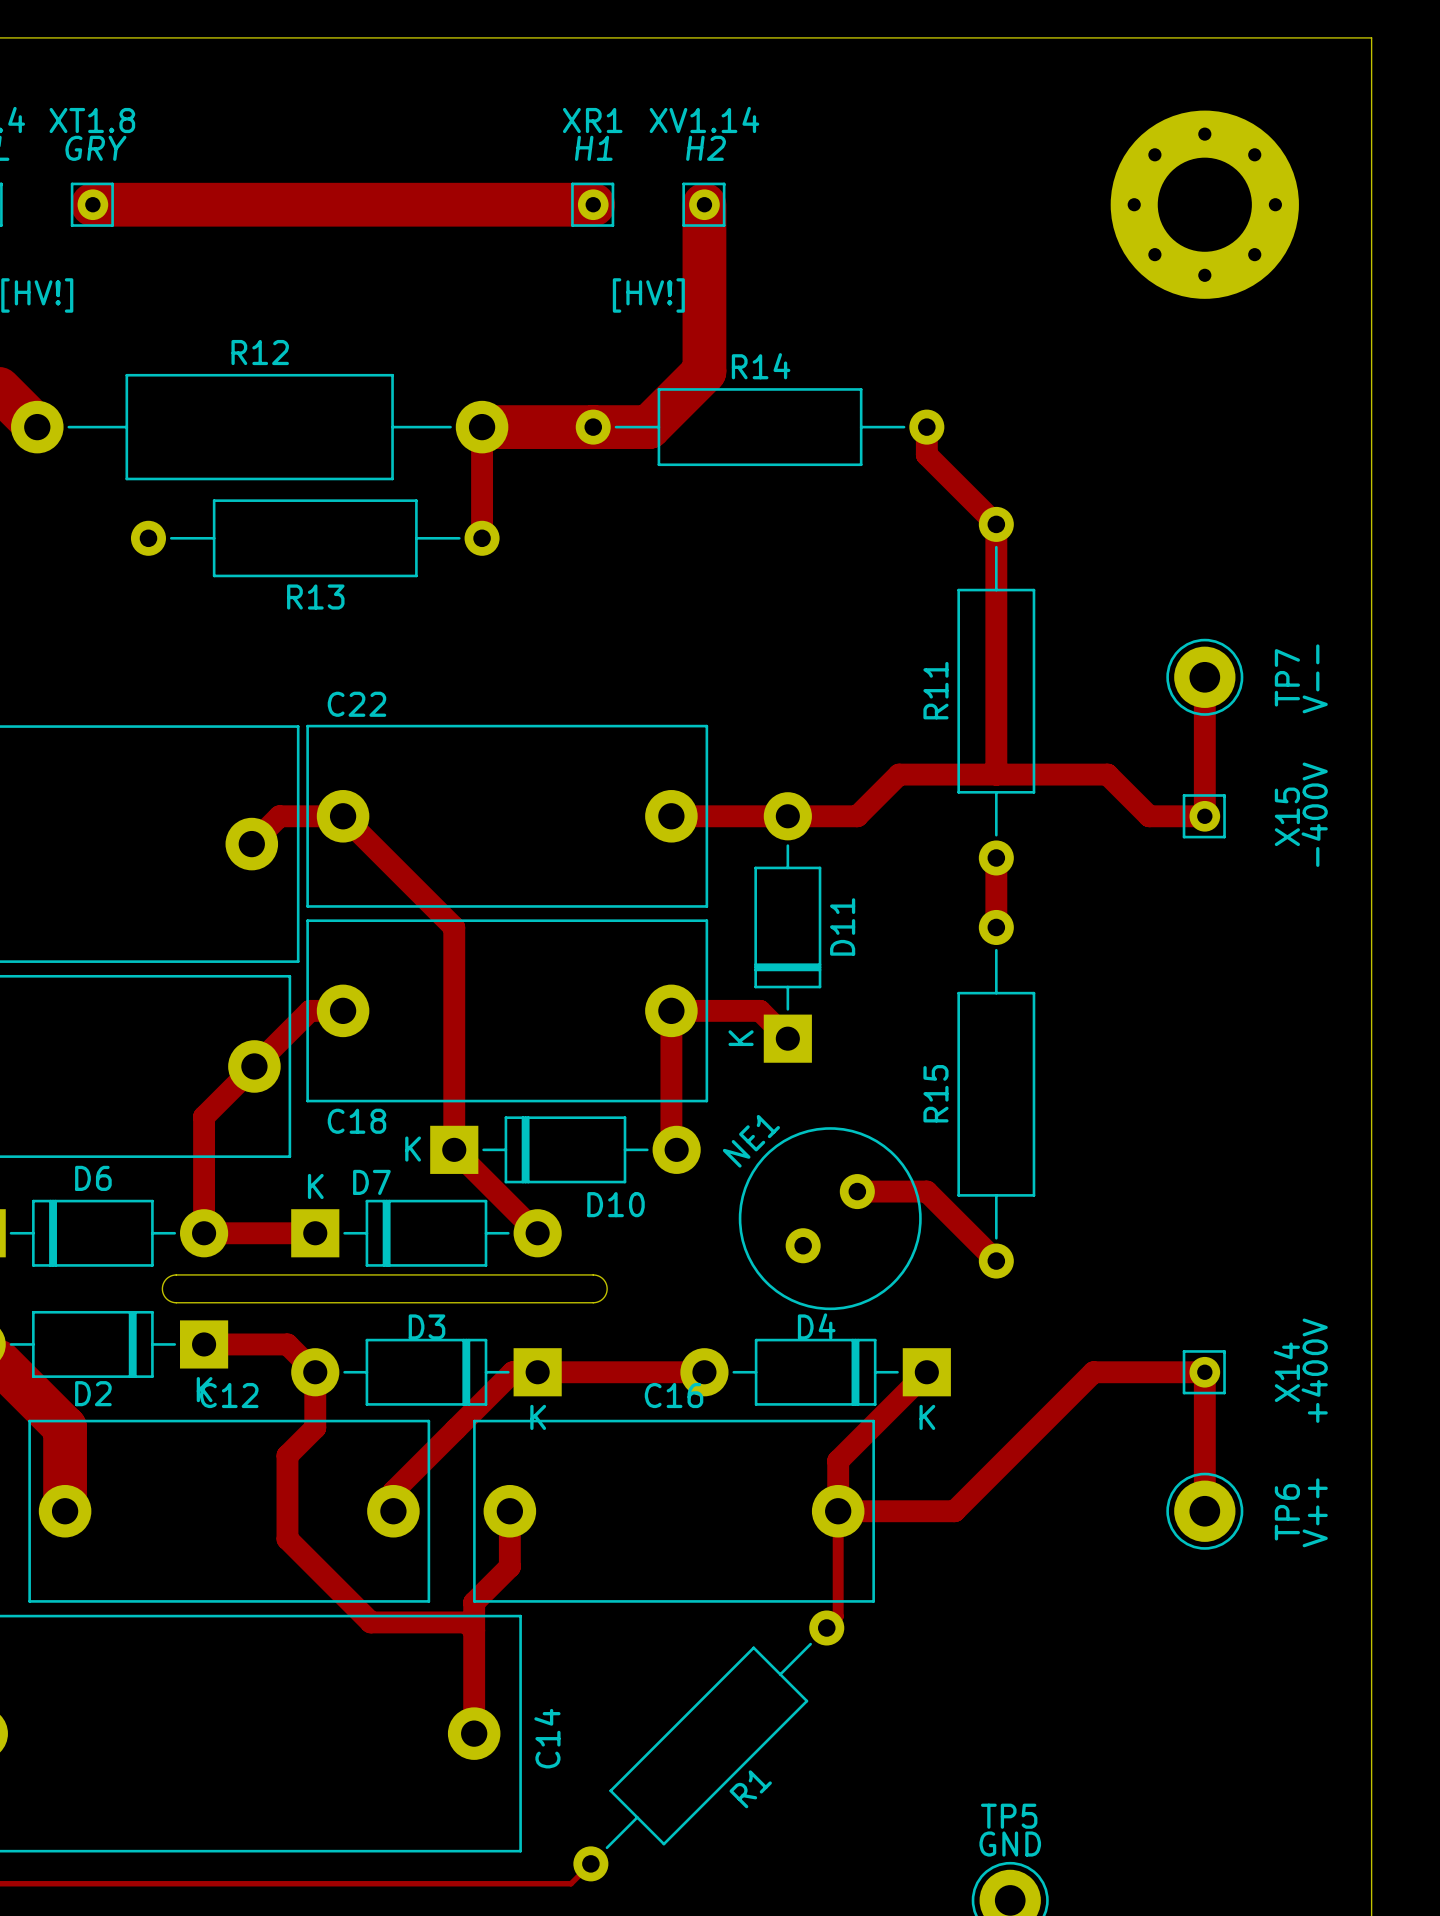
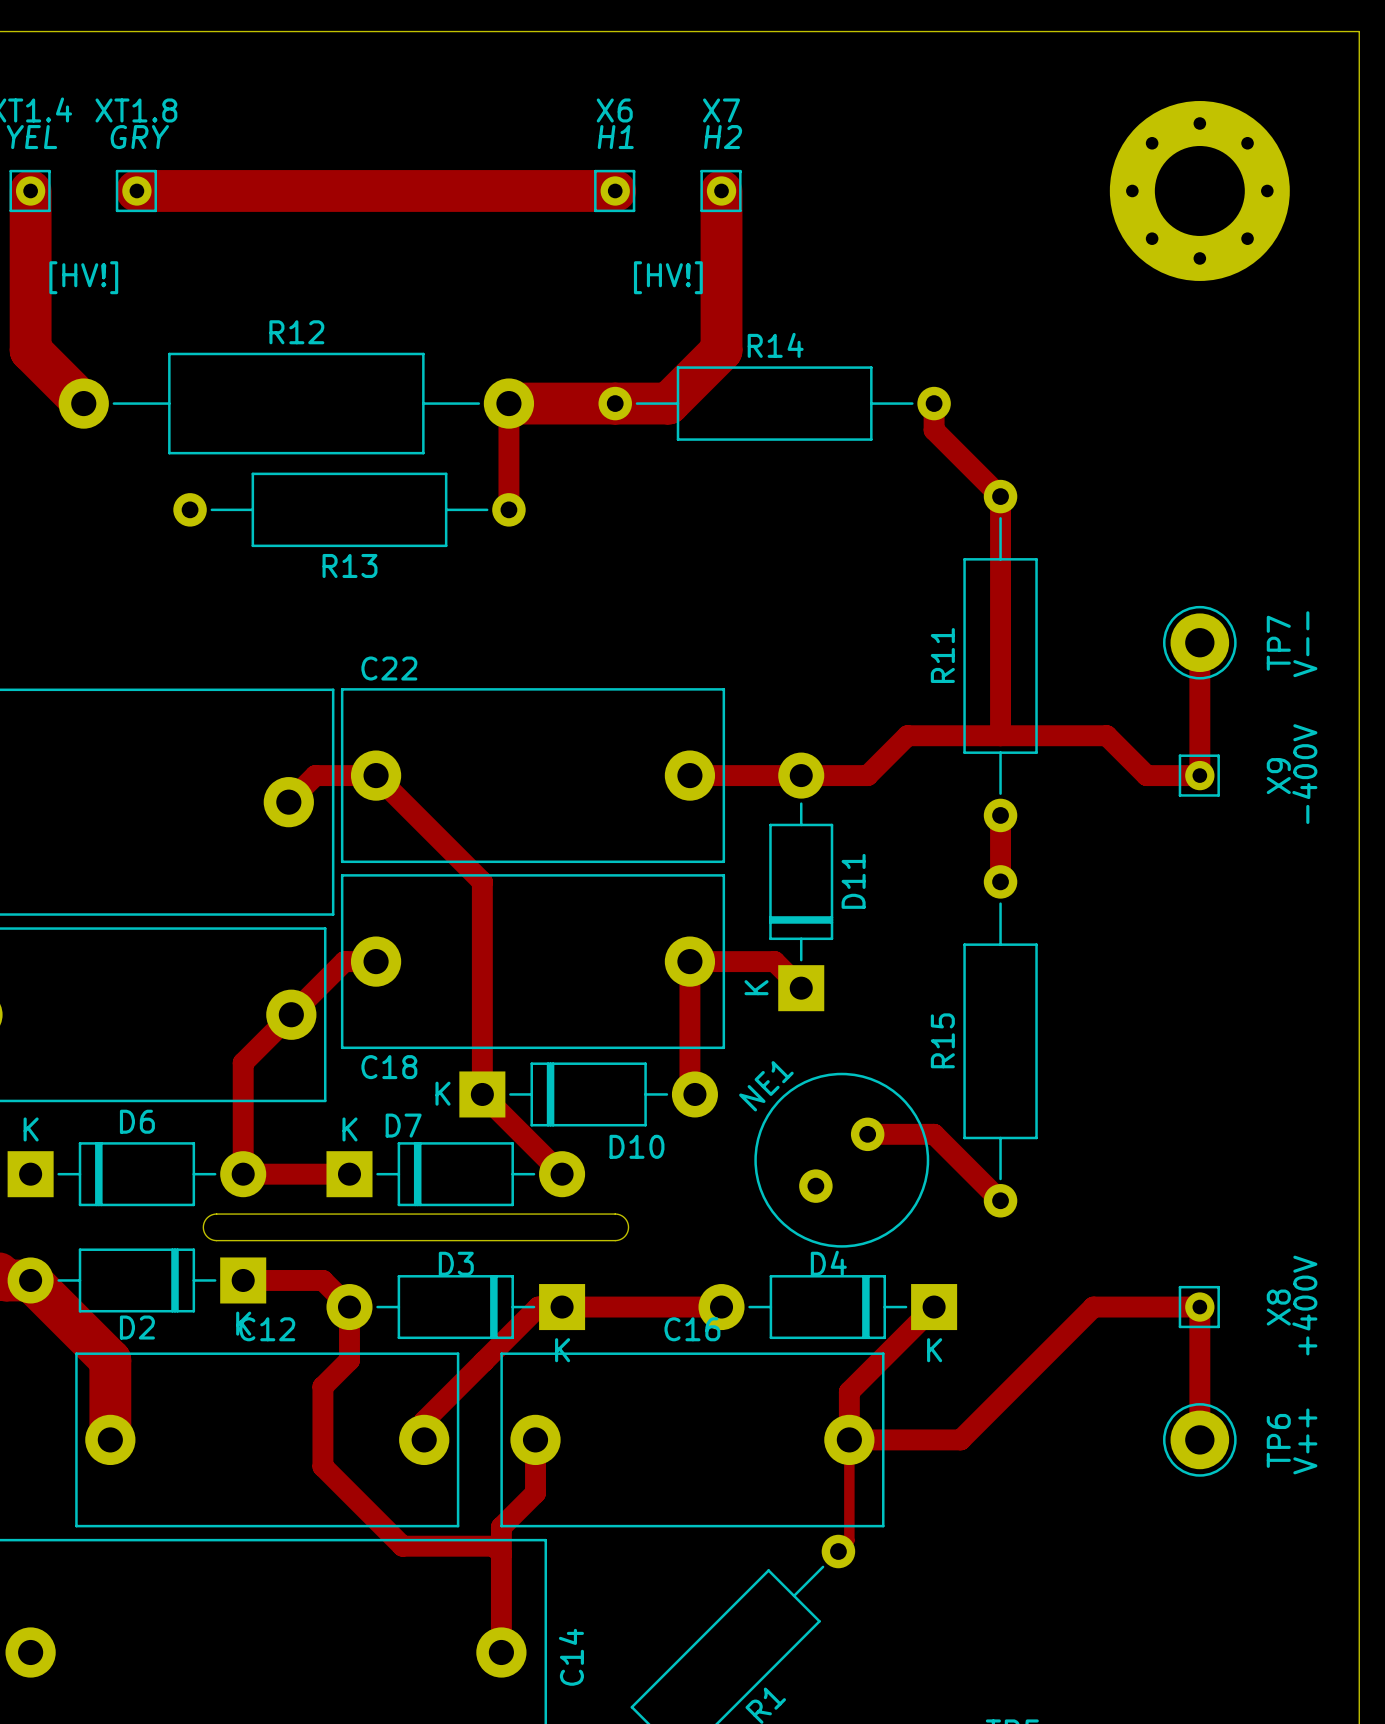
XV1.14 name: XV1.14 (704, 119) -> X7 (721, 110)
XR1 name: XR1 (592, 120) -> X6 (614, 110)
X15 name: X15 (1287, 816) -> X9 (1278, 776)
X14 name: X14 (1286, 1372) -> X8 (1278, 1307)

